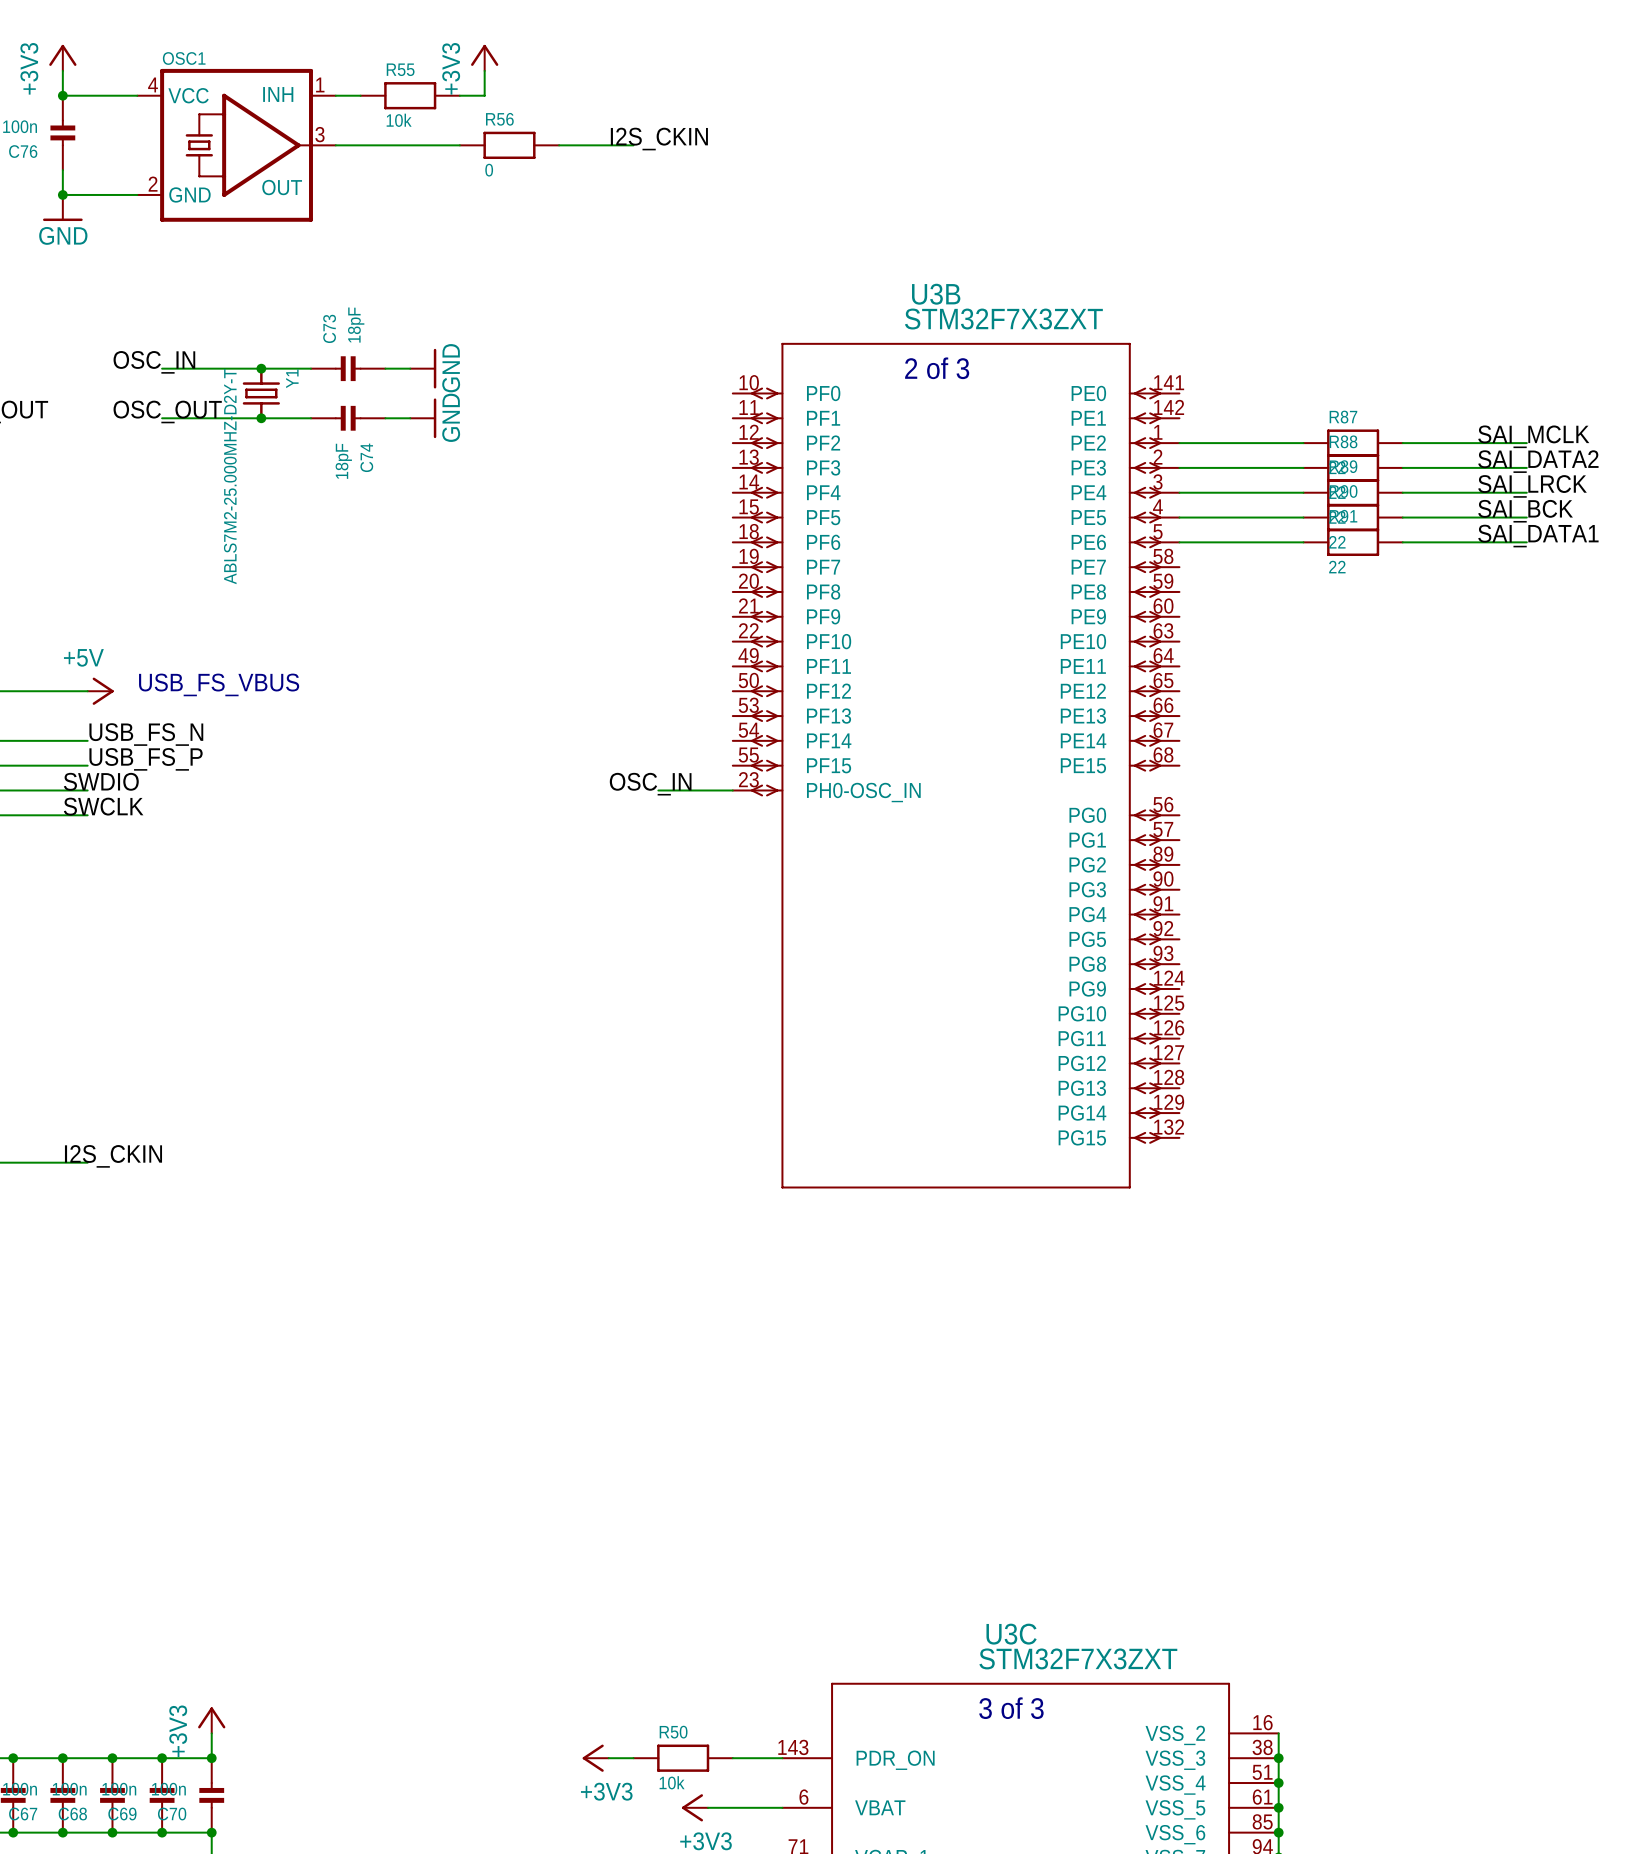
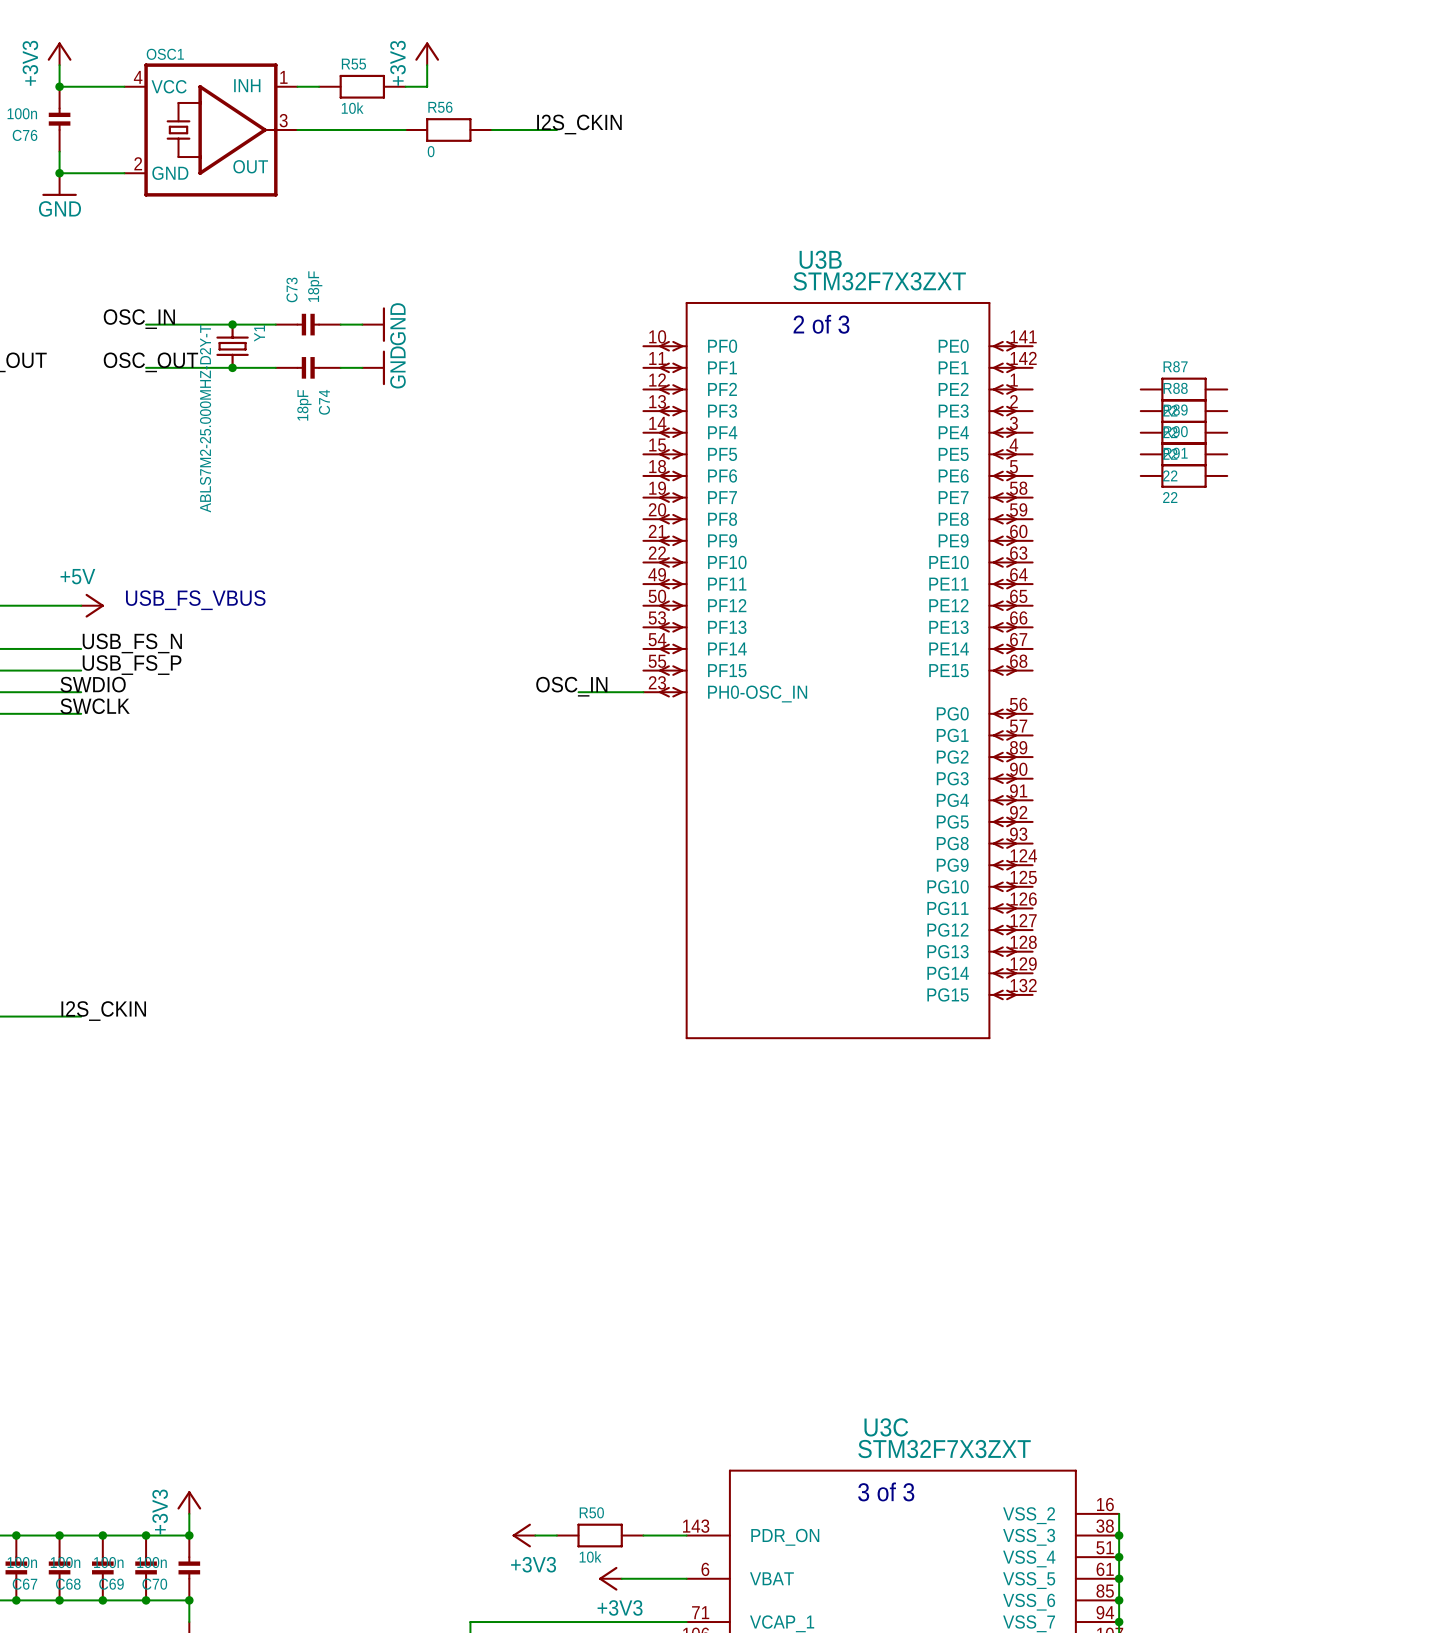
label: SAI_MCLK (1533, 436) -> none
wire: (1179, 443) (1303, 443) -> none
wire: (1402, 443) (1526, 443) -> none
label: SAI_DATA2 (1538, 461) -> none
wire: (1179, 467) (1303, 467) -> none
wire: (1402, 467) (1526, 467) -> none
label: SAI_LRCK (1532, 486) -> none
wire: (1179, 492) (1303, 492) -> none
wire: (1402, 492) (1526, 492) -> none
label: SAI_BCK (1525, 511) -> none
wire: (1179, 517) (1303, 517) -> none
wire: (1402, 517) (1526, 517) -> none
label: SAI_DATA1 (1538, 536) -> none
wire: (1179, 542) (1303, 542) -> none
wire: (1402, 542) (1526, 542) -> none

